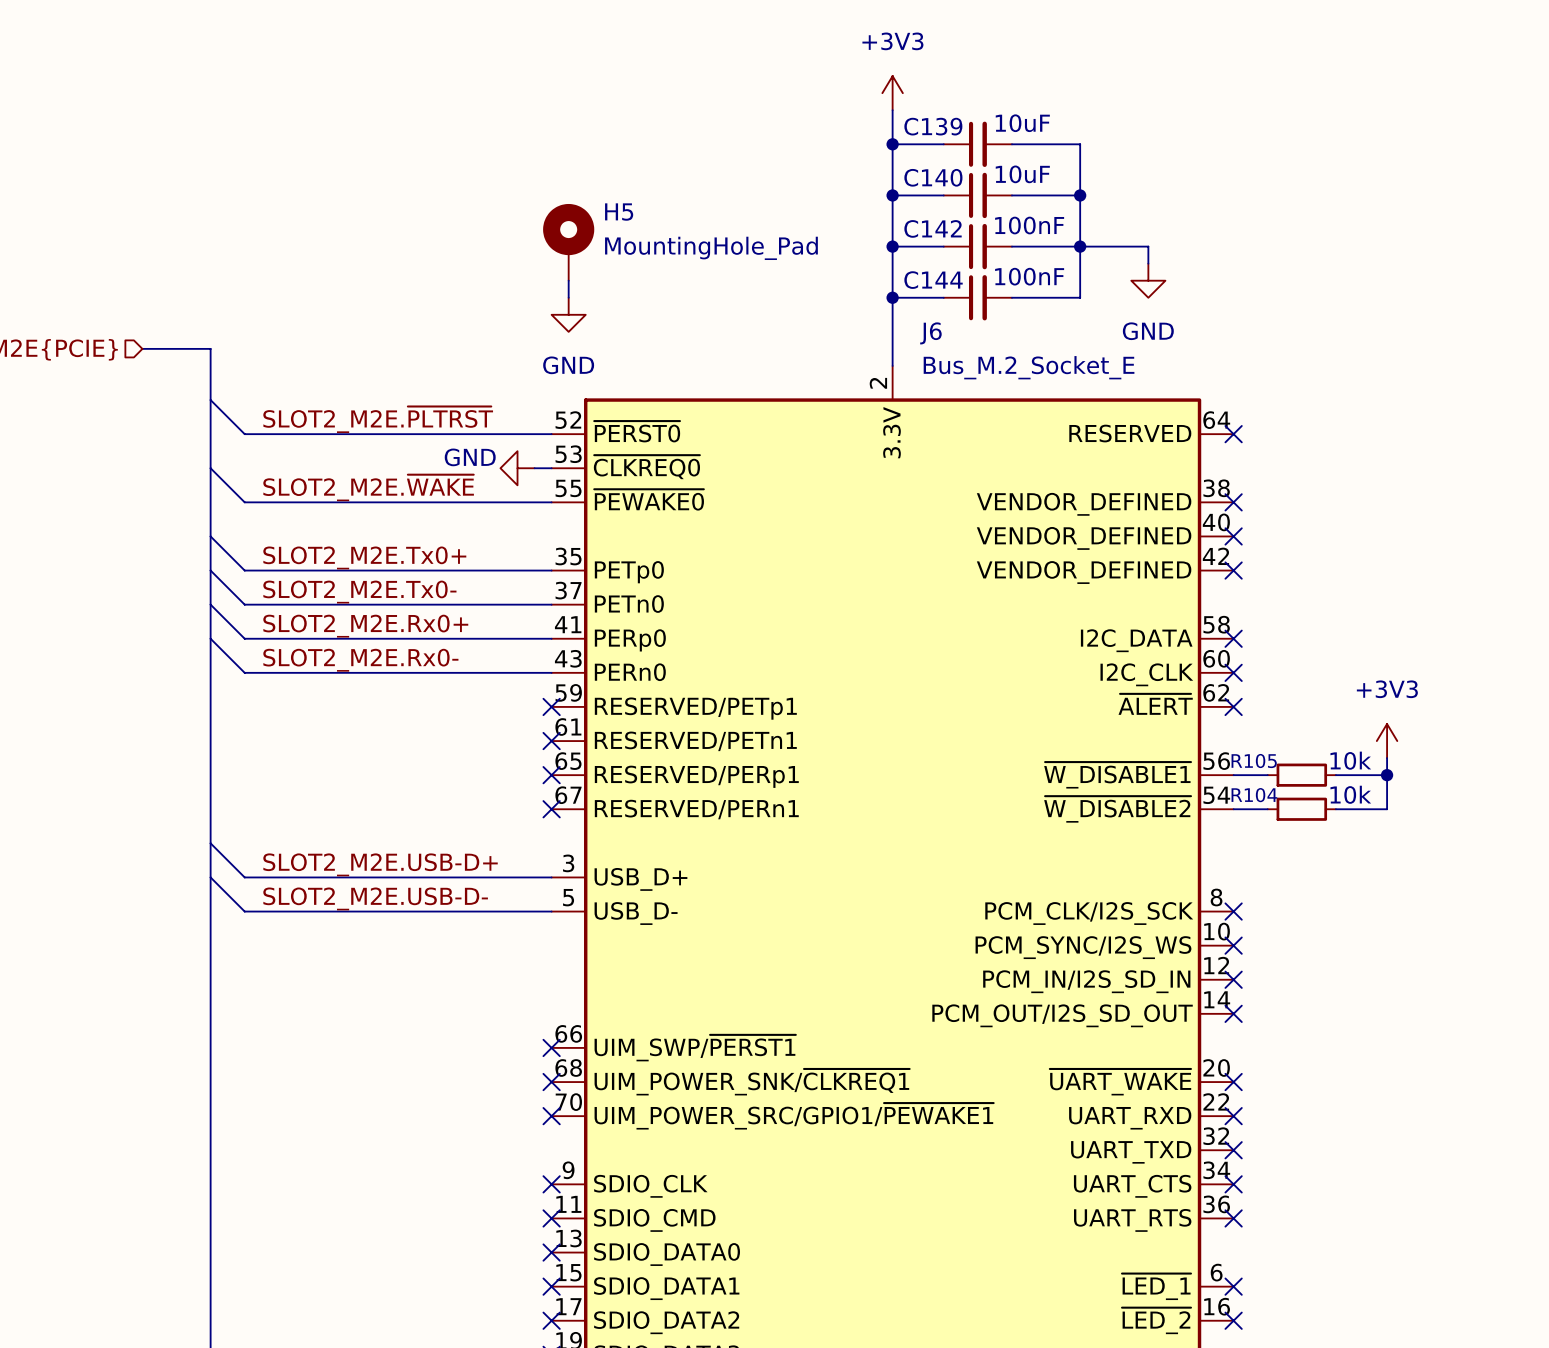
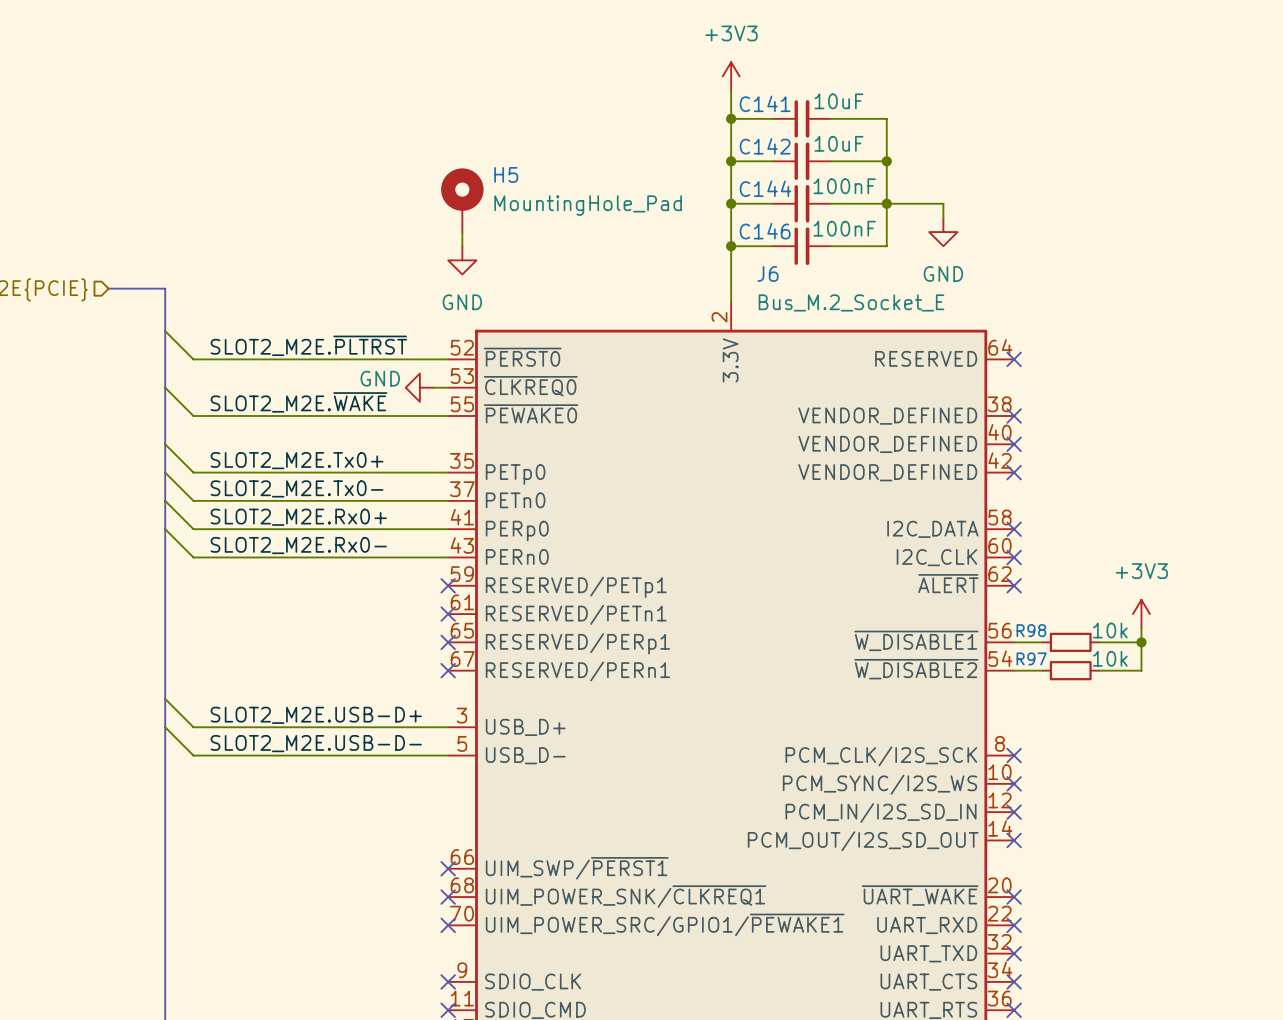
C139 name: C139 (933, 126) -> C141 (765, 103)
C140 name: C140 (933, 177) -> C142 (765, 146)
C142 name: C142 (933, 228) -> C144 (765, 188)
C144 name: C144 (933, 280) -> C146 (765, 231)
R105 name: R105 (1254, 761) -> R98 (1031, 630)
R104 name: R104 (1254, 795) -> R97 (1031, 658)

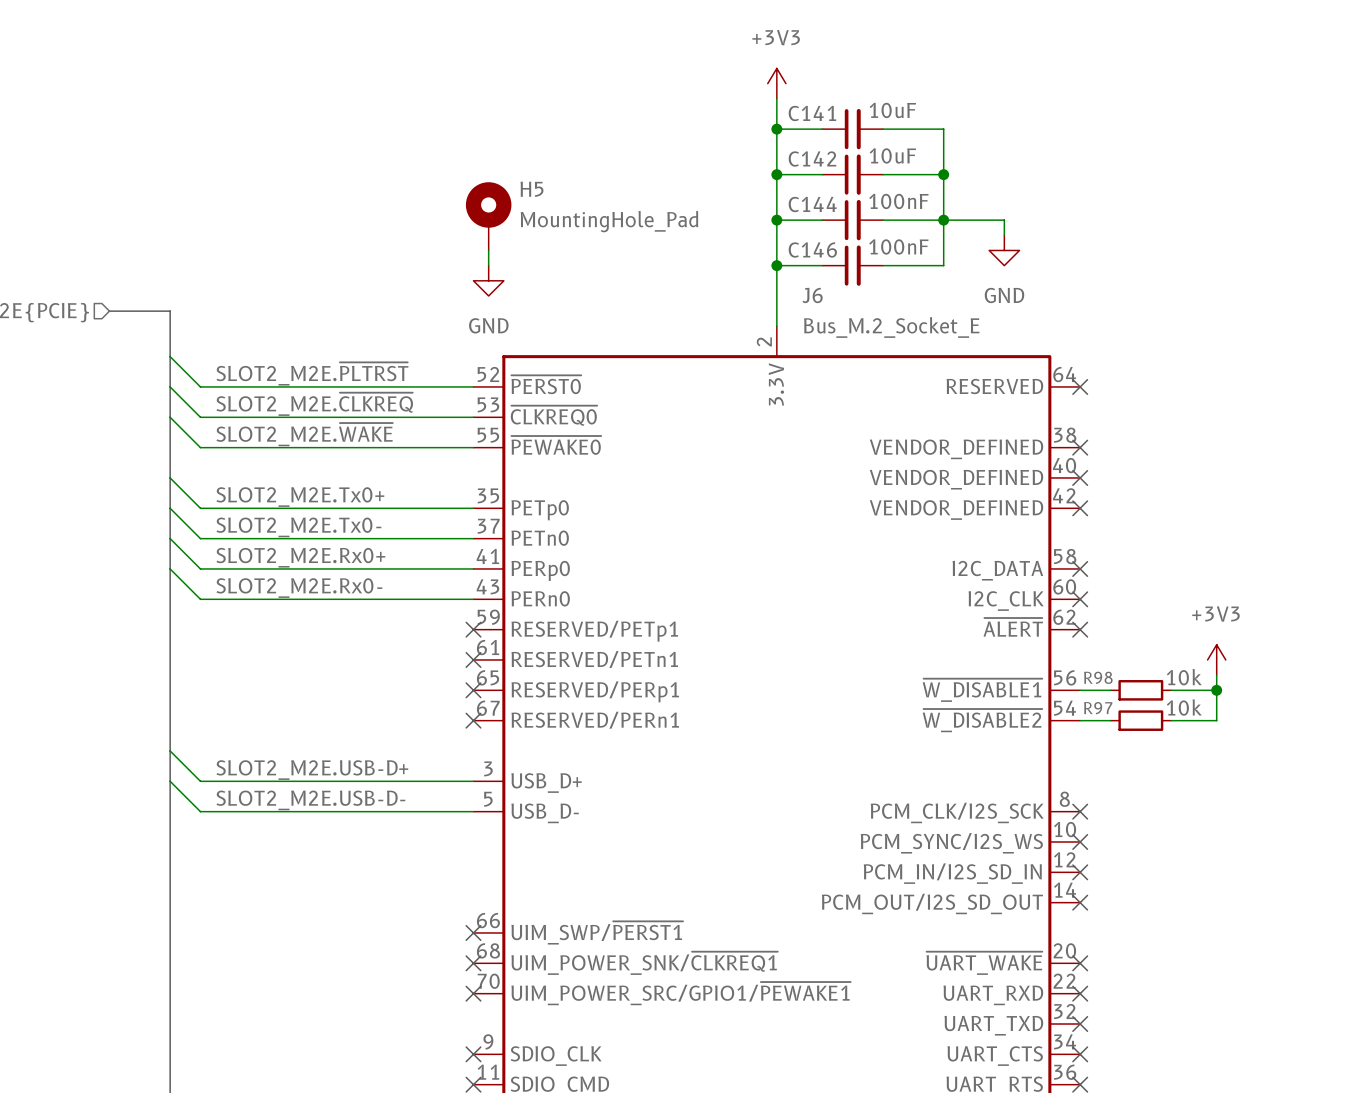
wire: none -> (170, 386) (200, 417) (458, 417)
label: none -> SLOT2_M2E.~{CLKREQ} (314, 404)
power symbol: GND (419, 387) -> none

